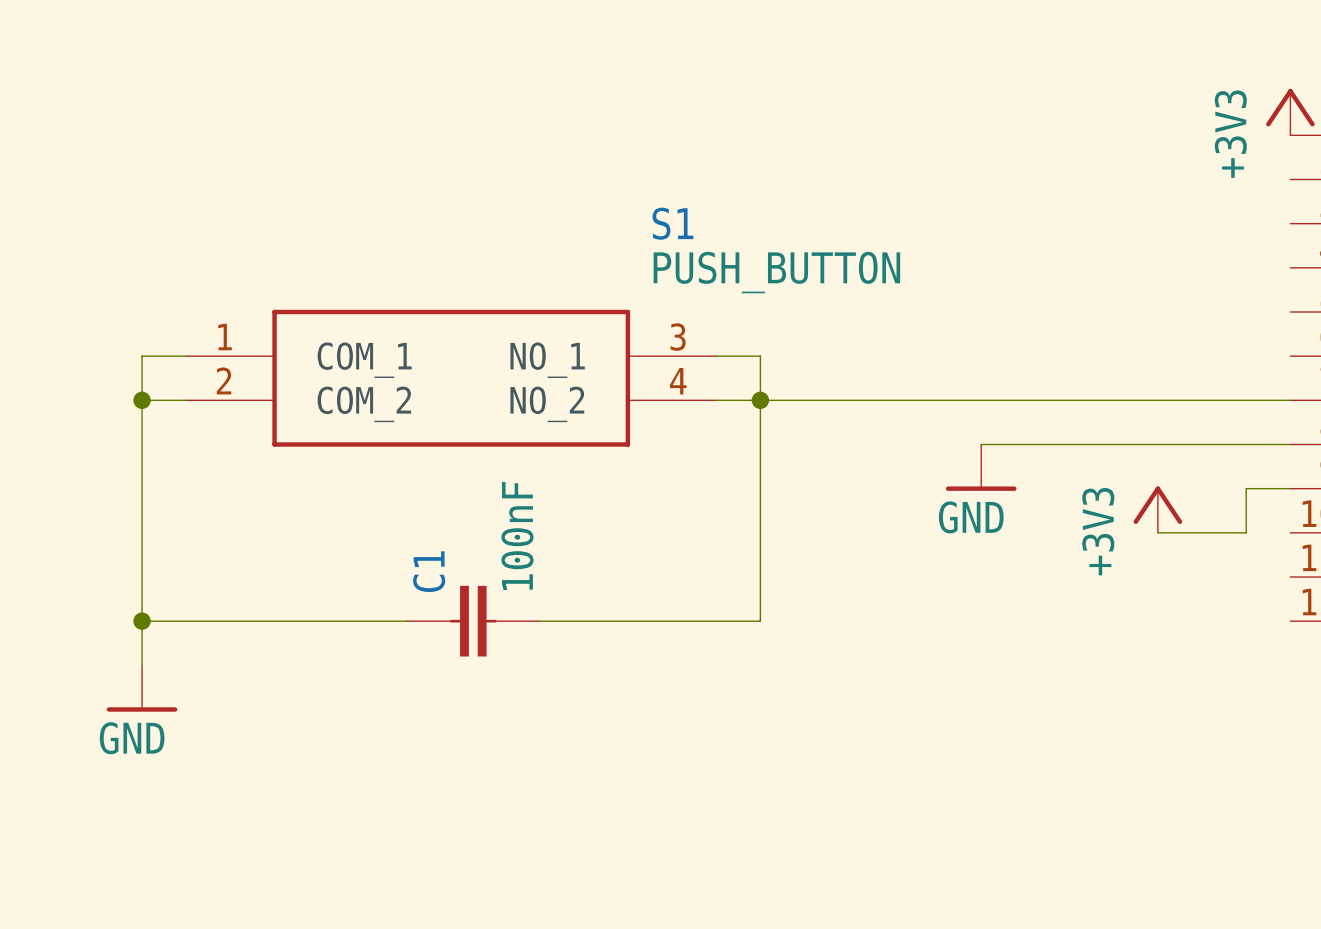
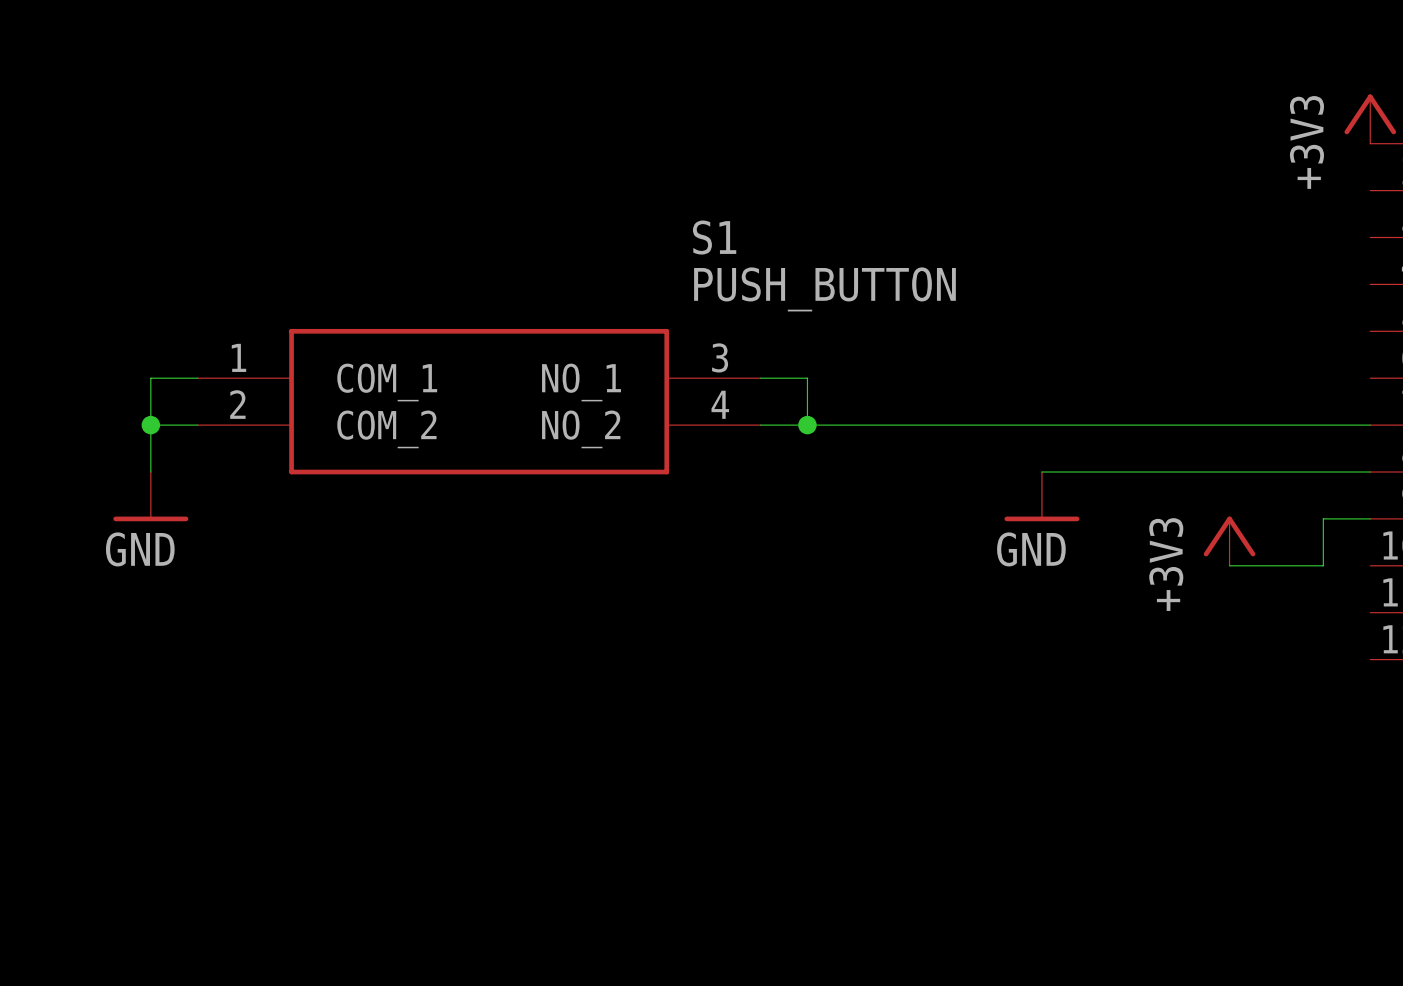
wire: (760, 400) (760, 621) (539, 621) -> none
wire: (142, 444) (142, 665) -> none
wire: (142, 621) (407, 621) -> none
junction: (142, 621) -> none
C1: 100nF (473, 621) -> none
power symbol position: GND (142, 688) -> GND (150, 496)

